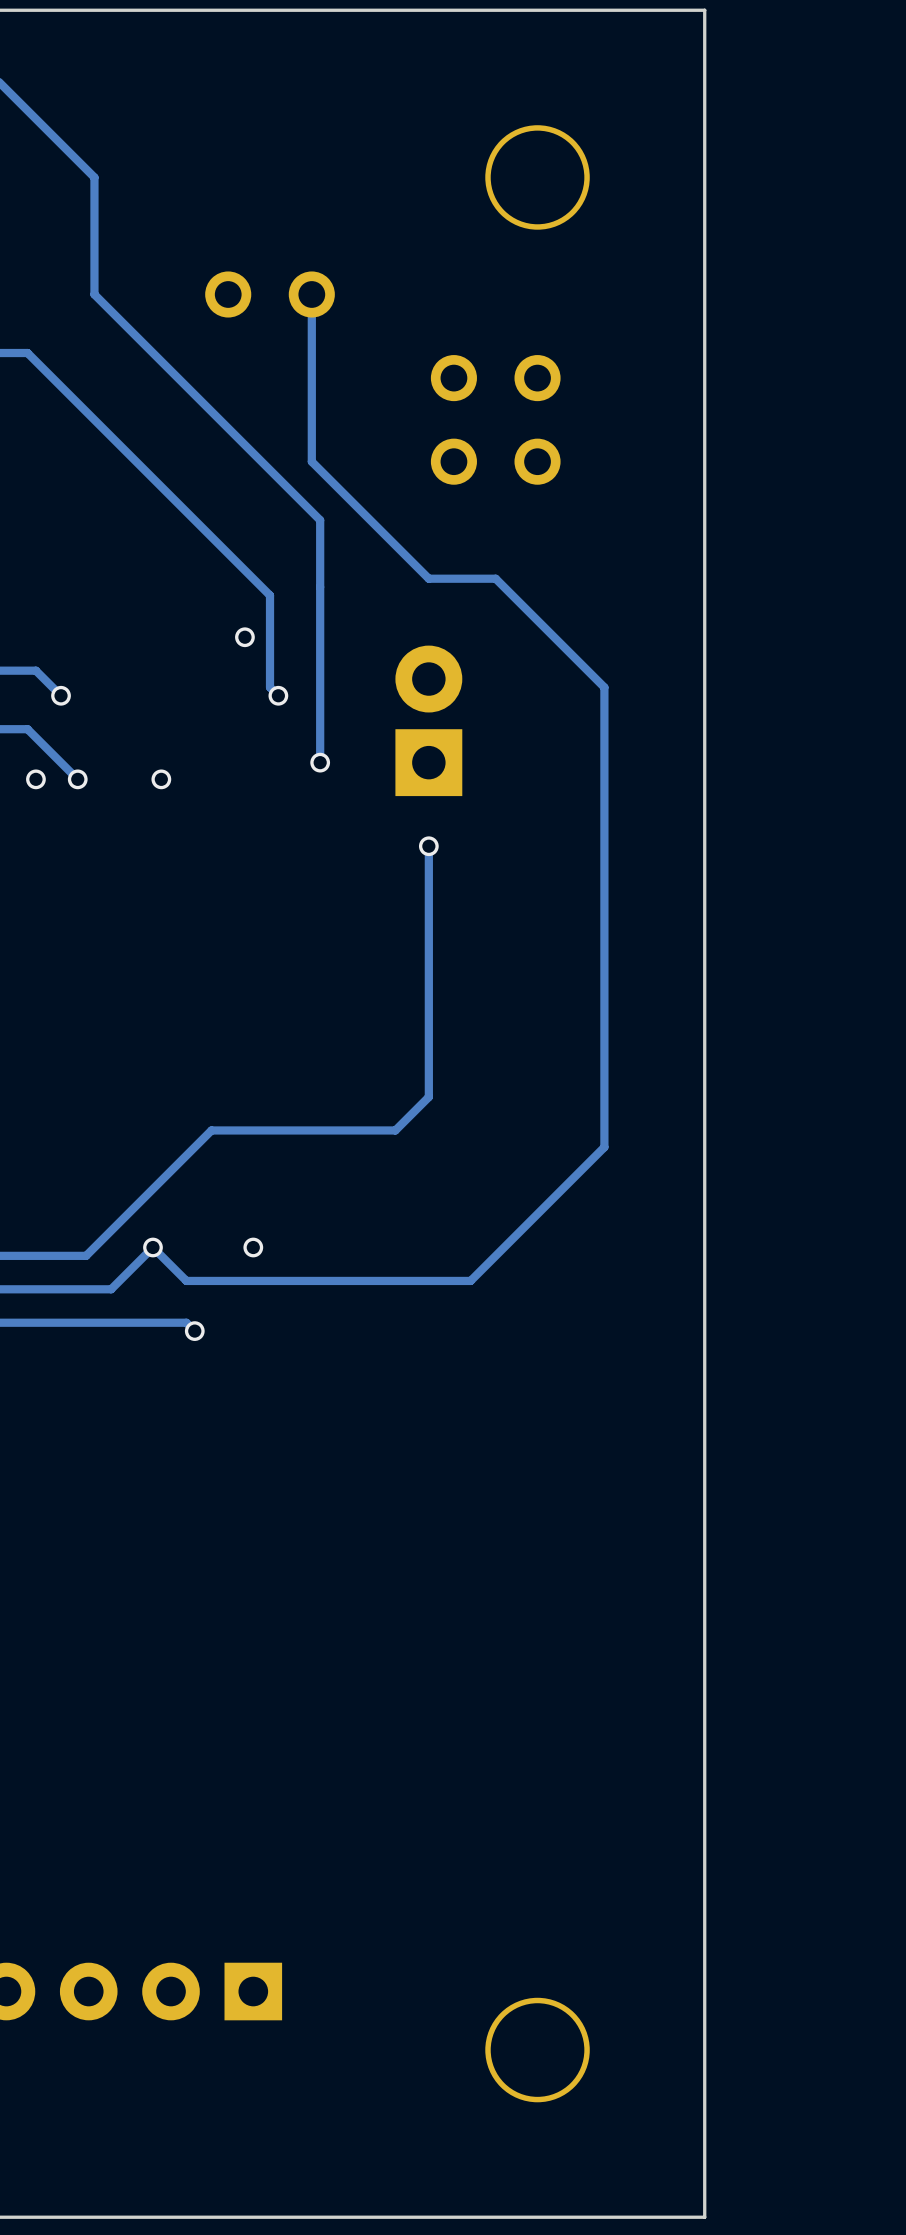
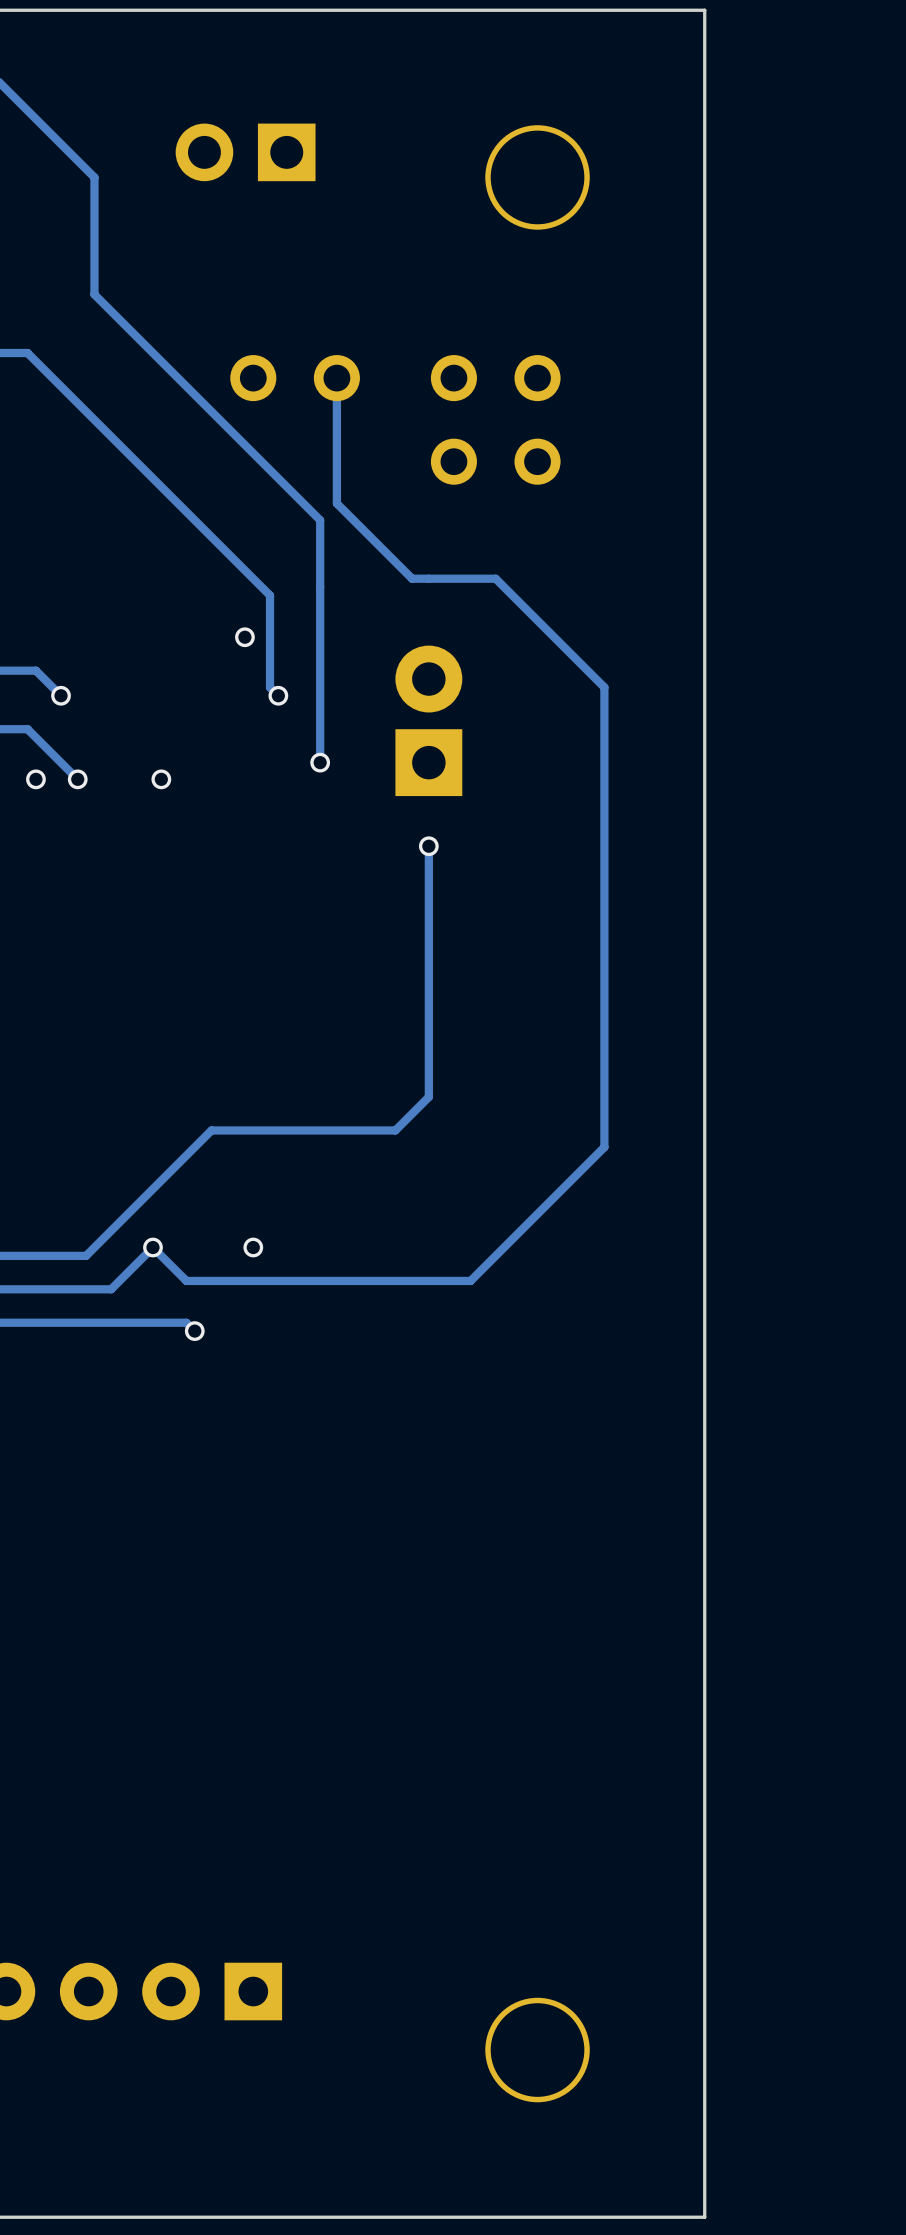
part: none -> (245, 152)
part position: (270, 294) -> (295, 378)
track: (311, 294) (311, 461) (428, 578) -> (336, 378) (336, 503) (412, 578) (428, 578)

